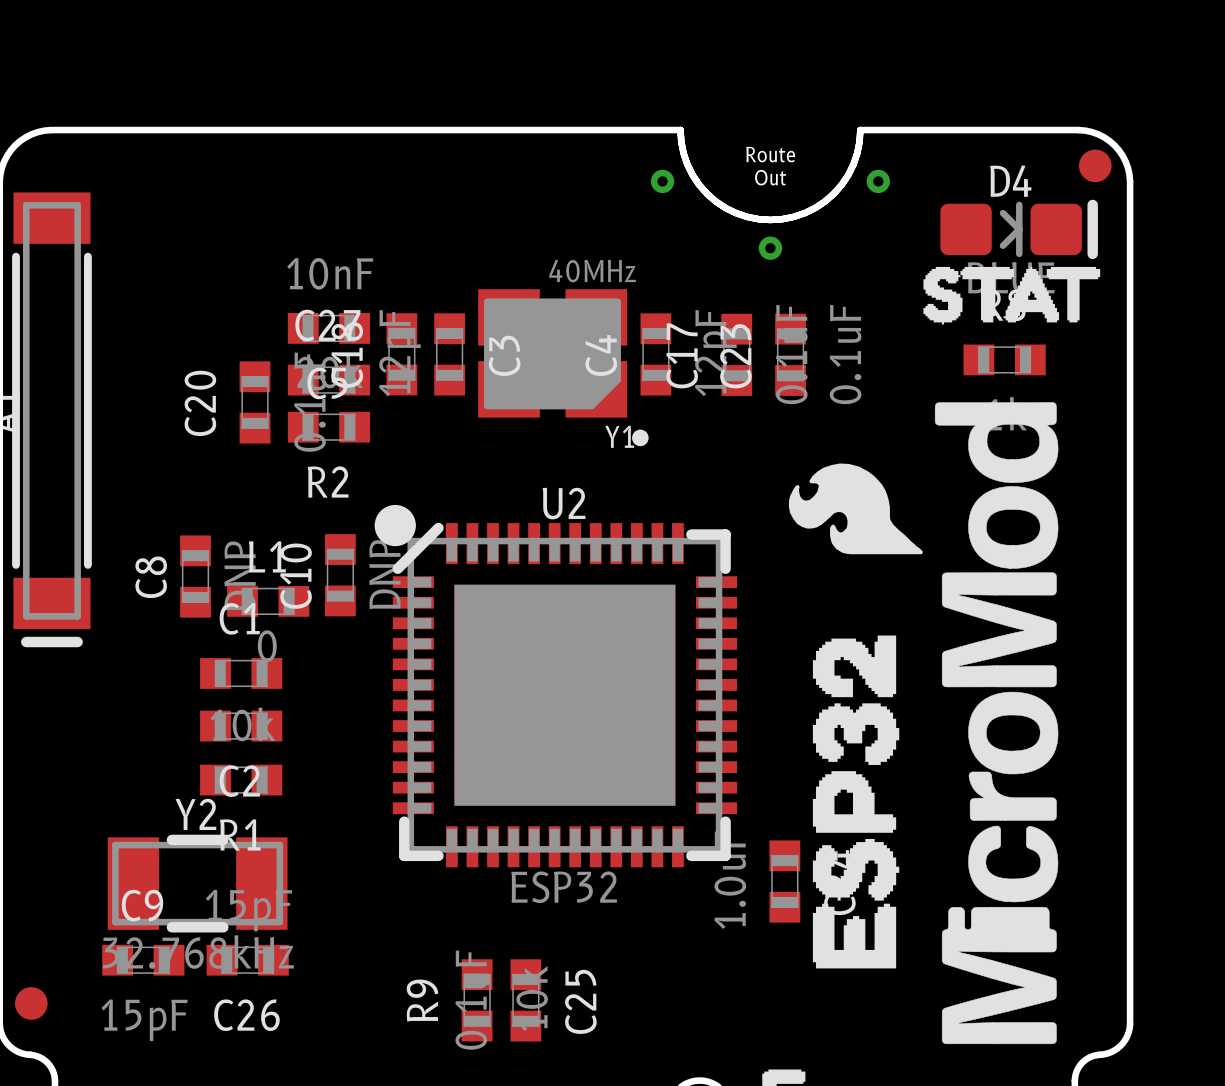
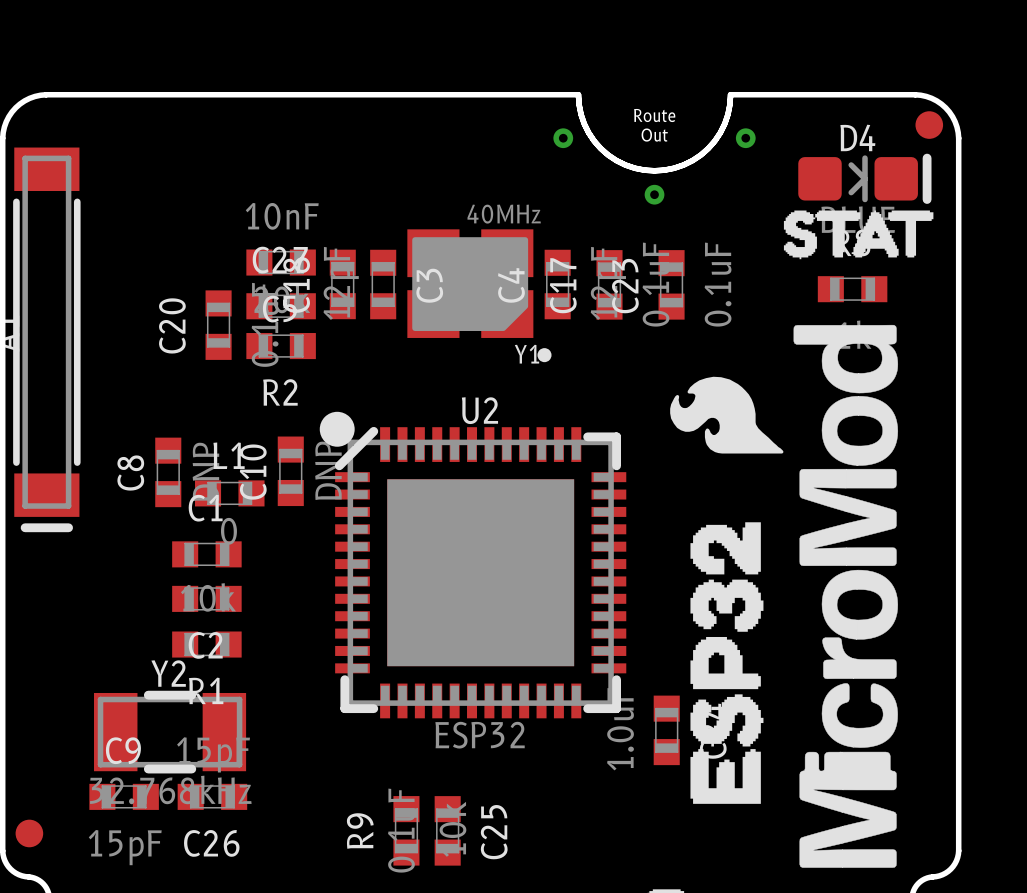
C17 position: (736, 354) -> (609, 284)

